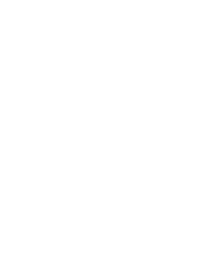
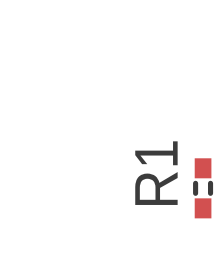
R1: none -> (203, 188)

